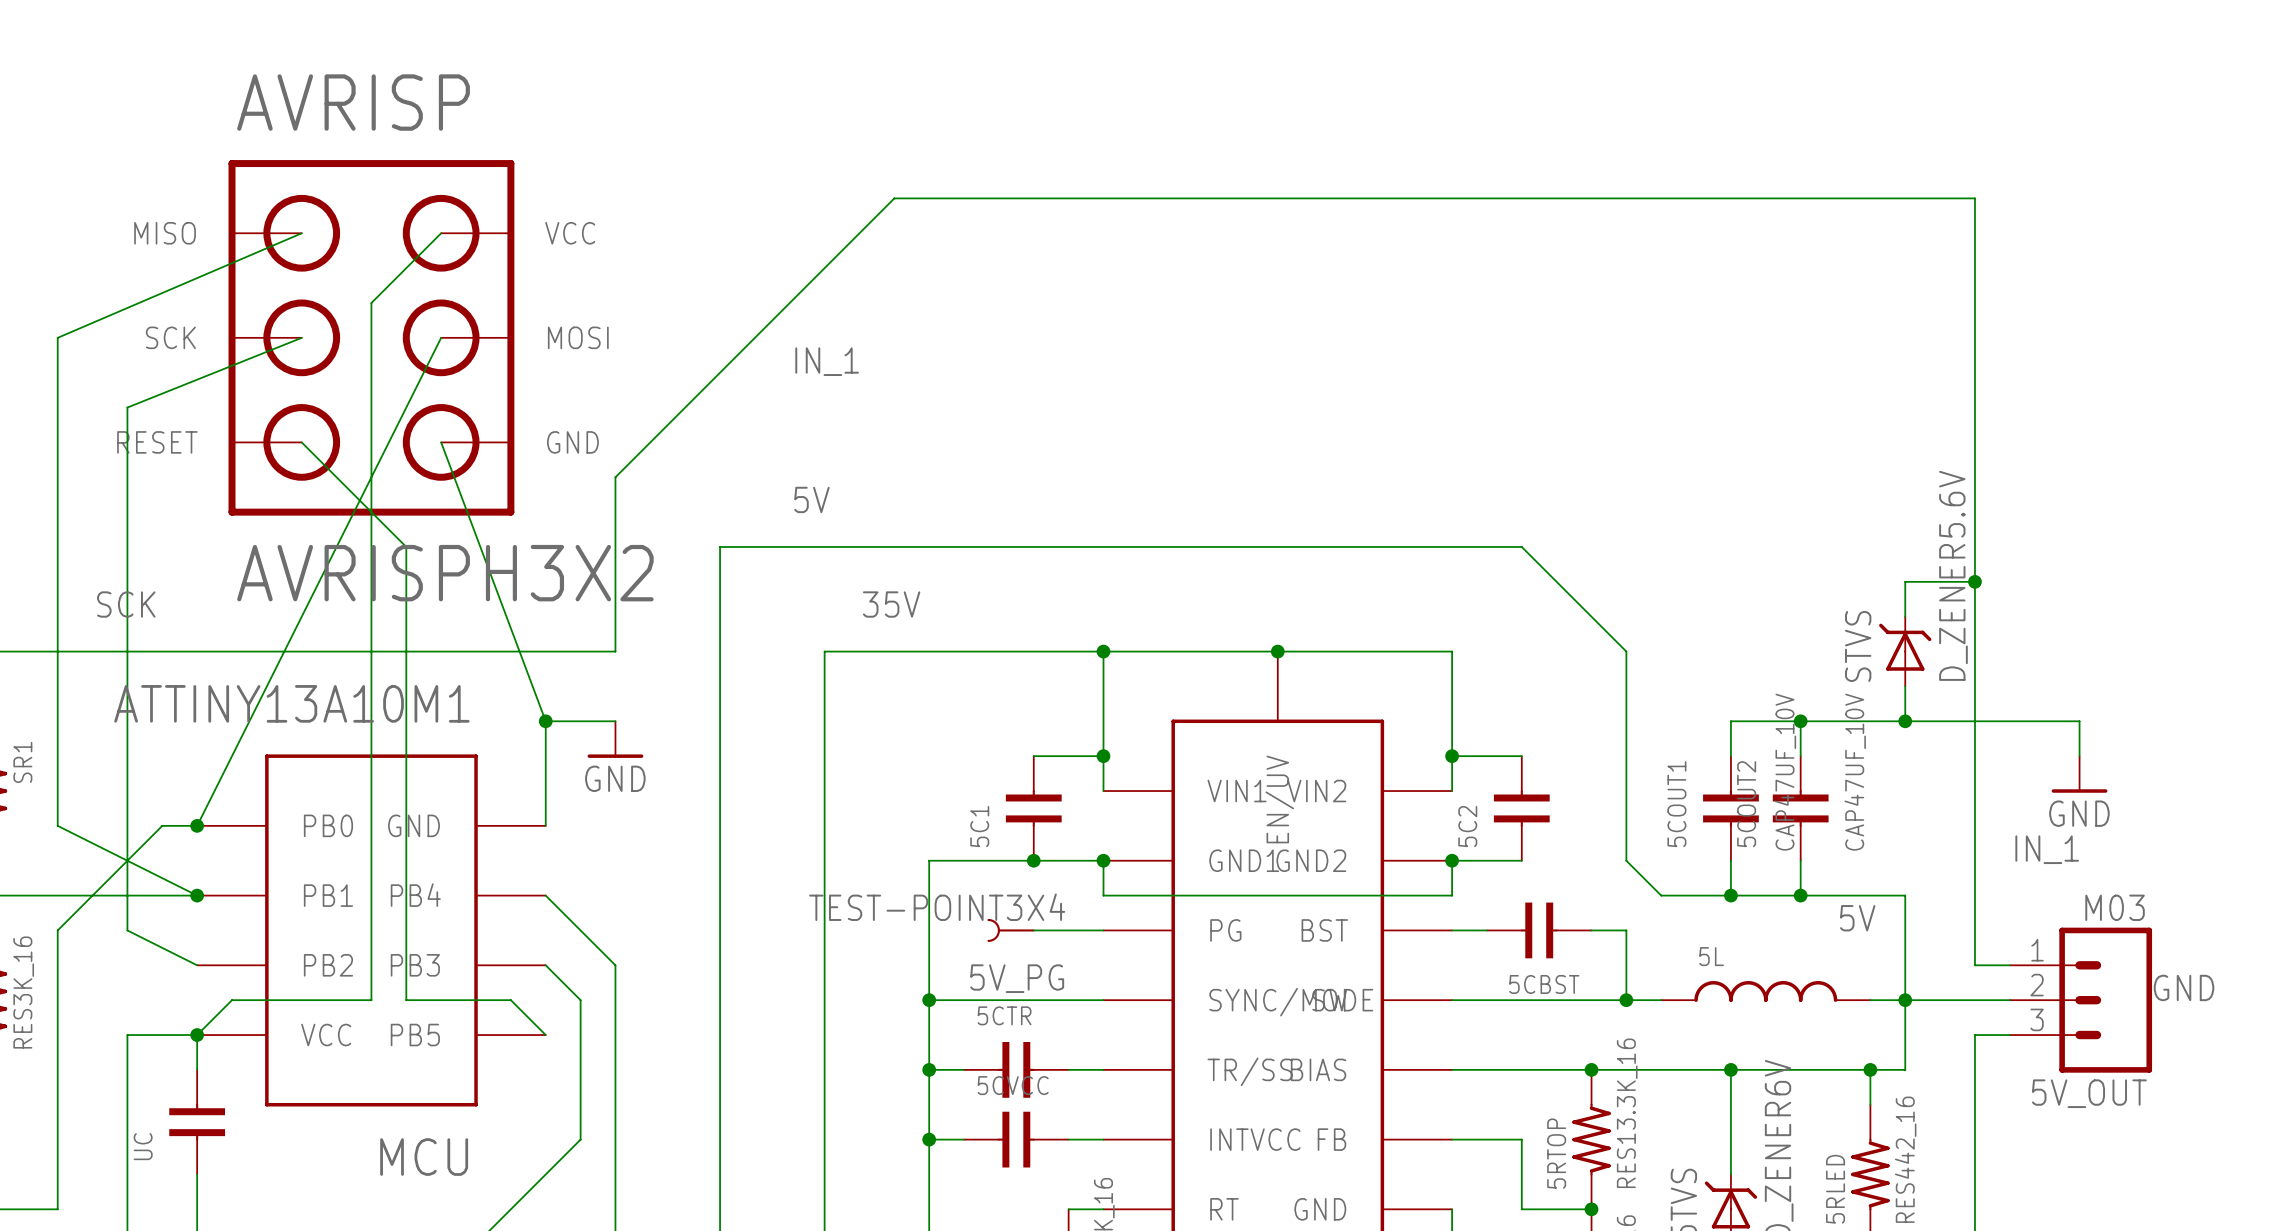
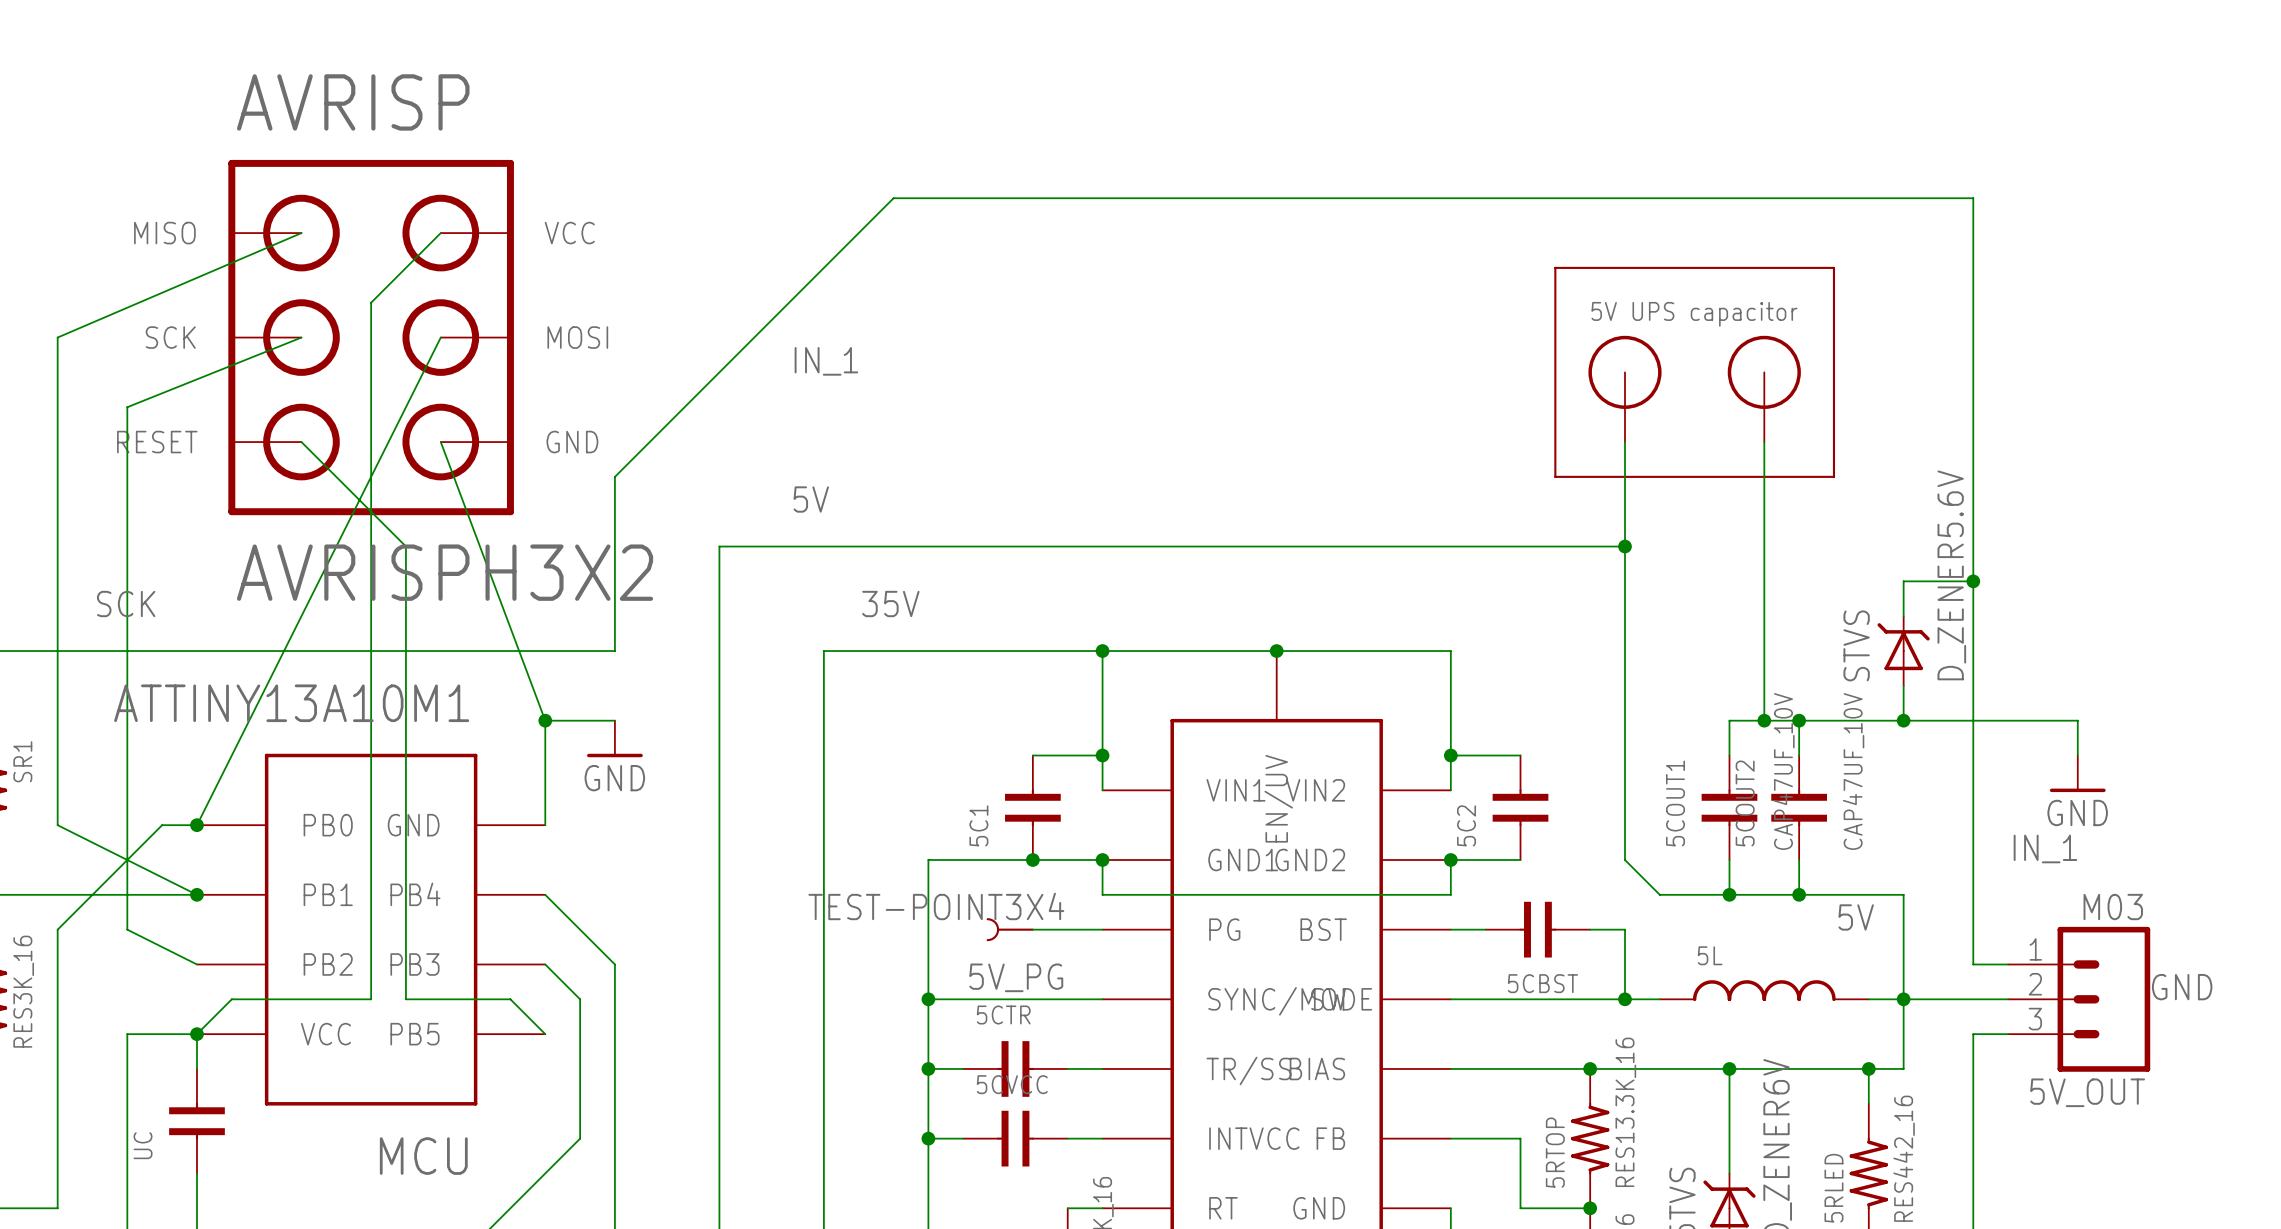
line: none -> (1555, 267) (1833, 267) (1833, 476) (1555, 476) (1555, 267)
text: none -> 5V UPS capacitor (1694, 314)
part: none -> (1625, 388)
part: none -> (1764, 388)
wire: none -> (1625, 442) (1625, 651)
wire: none -> (1764, 442) (1764, 720)
wire: (1521, 547) (1626, 651) -> (1520, 546) (1625, 546)
junction: none -> (1625, 546)
junction: none -> (1764, 720)

